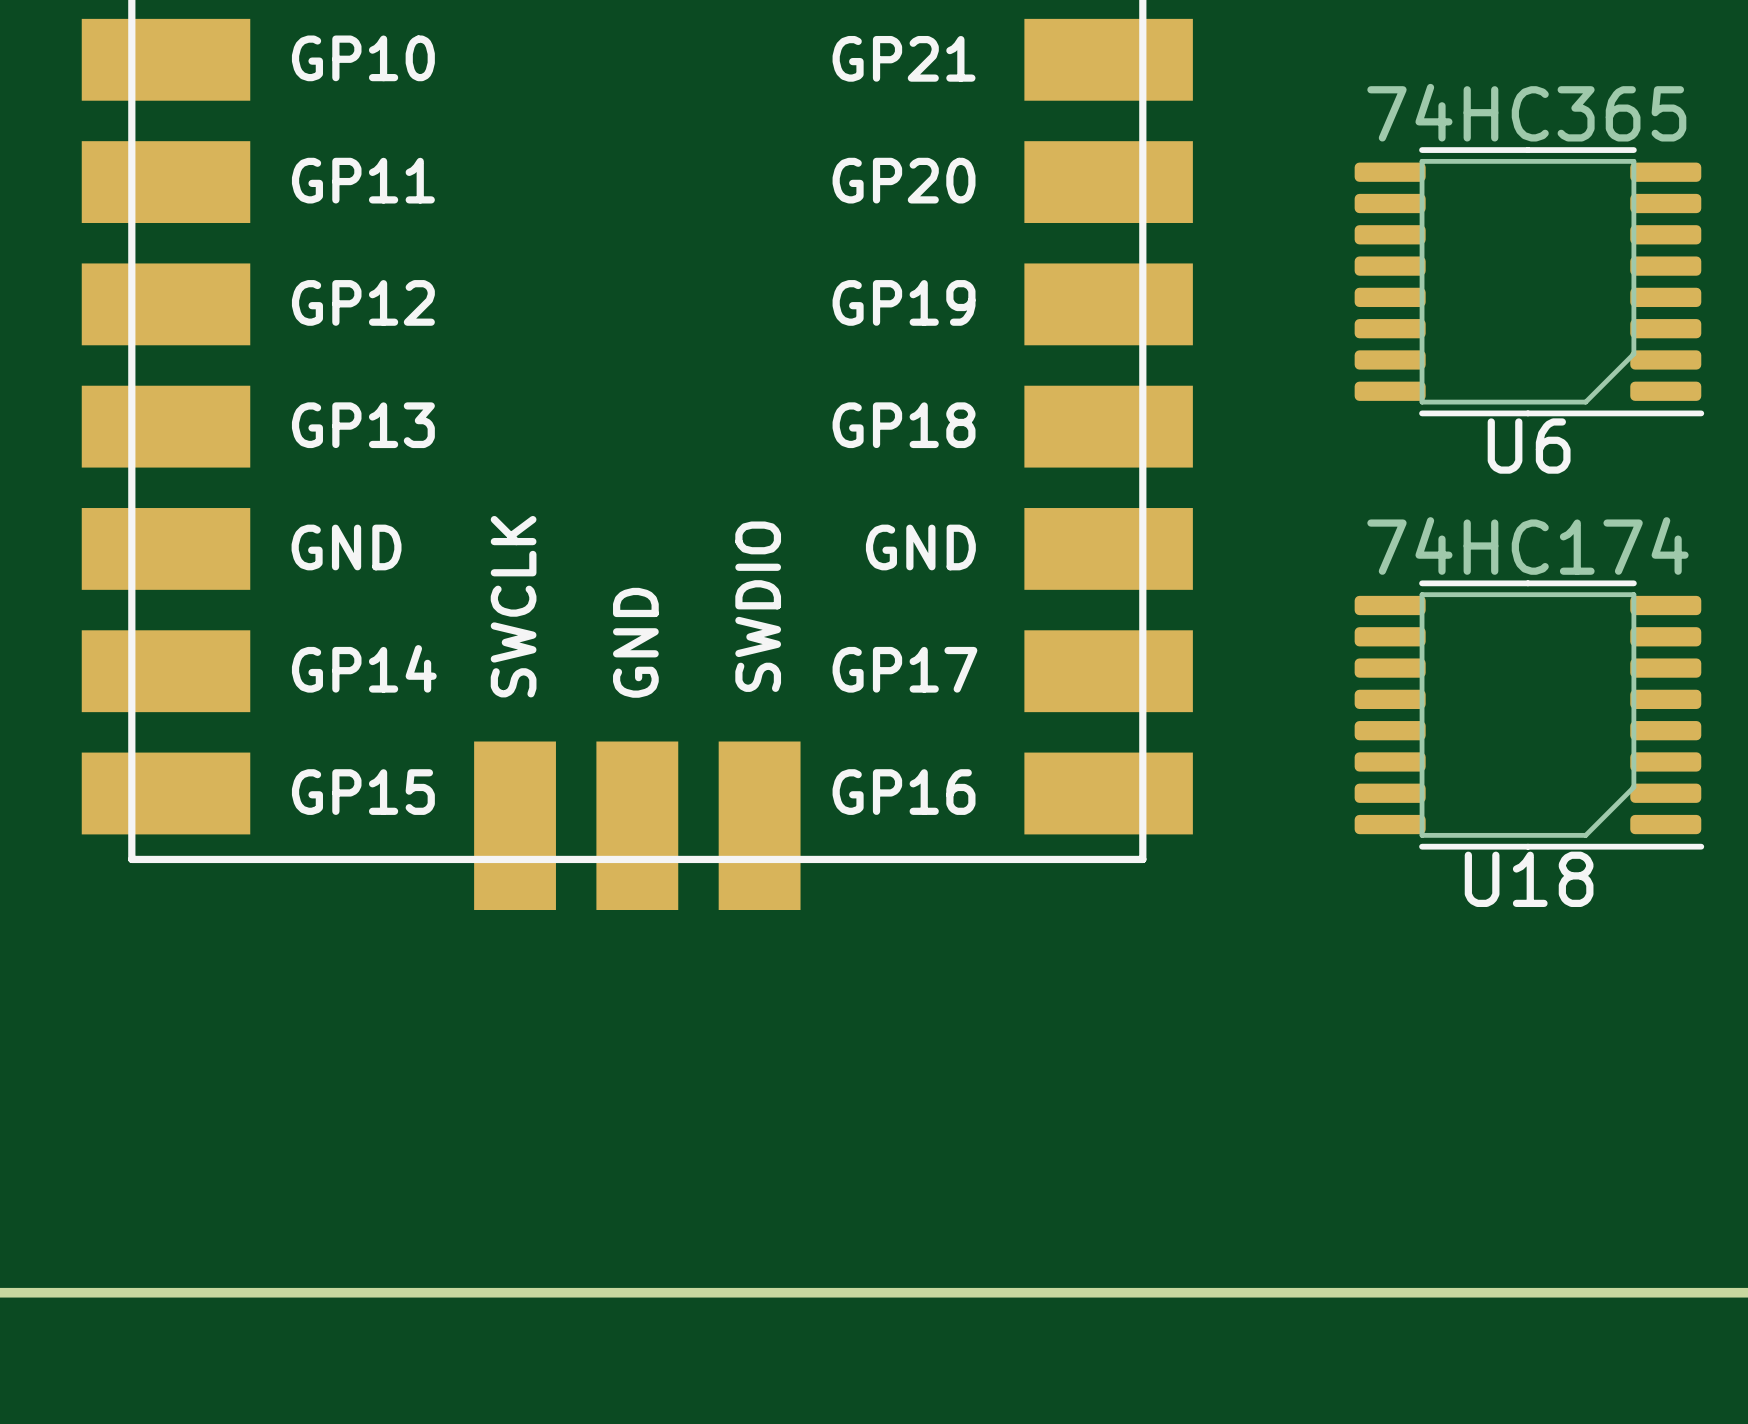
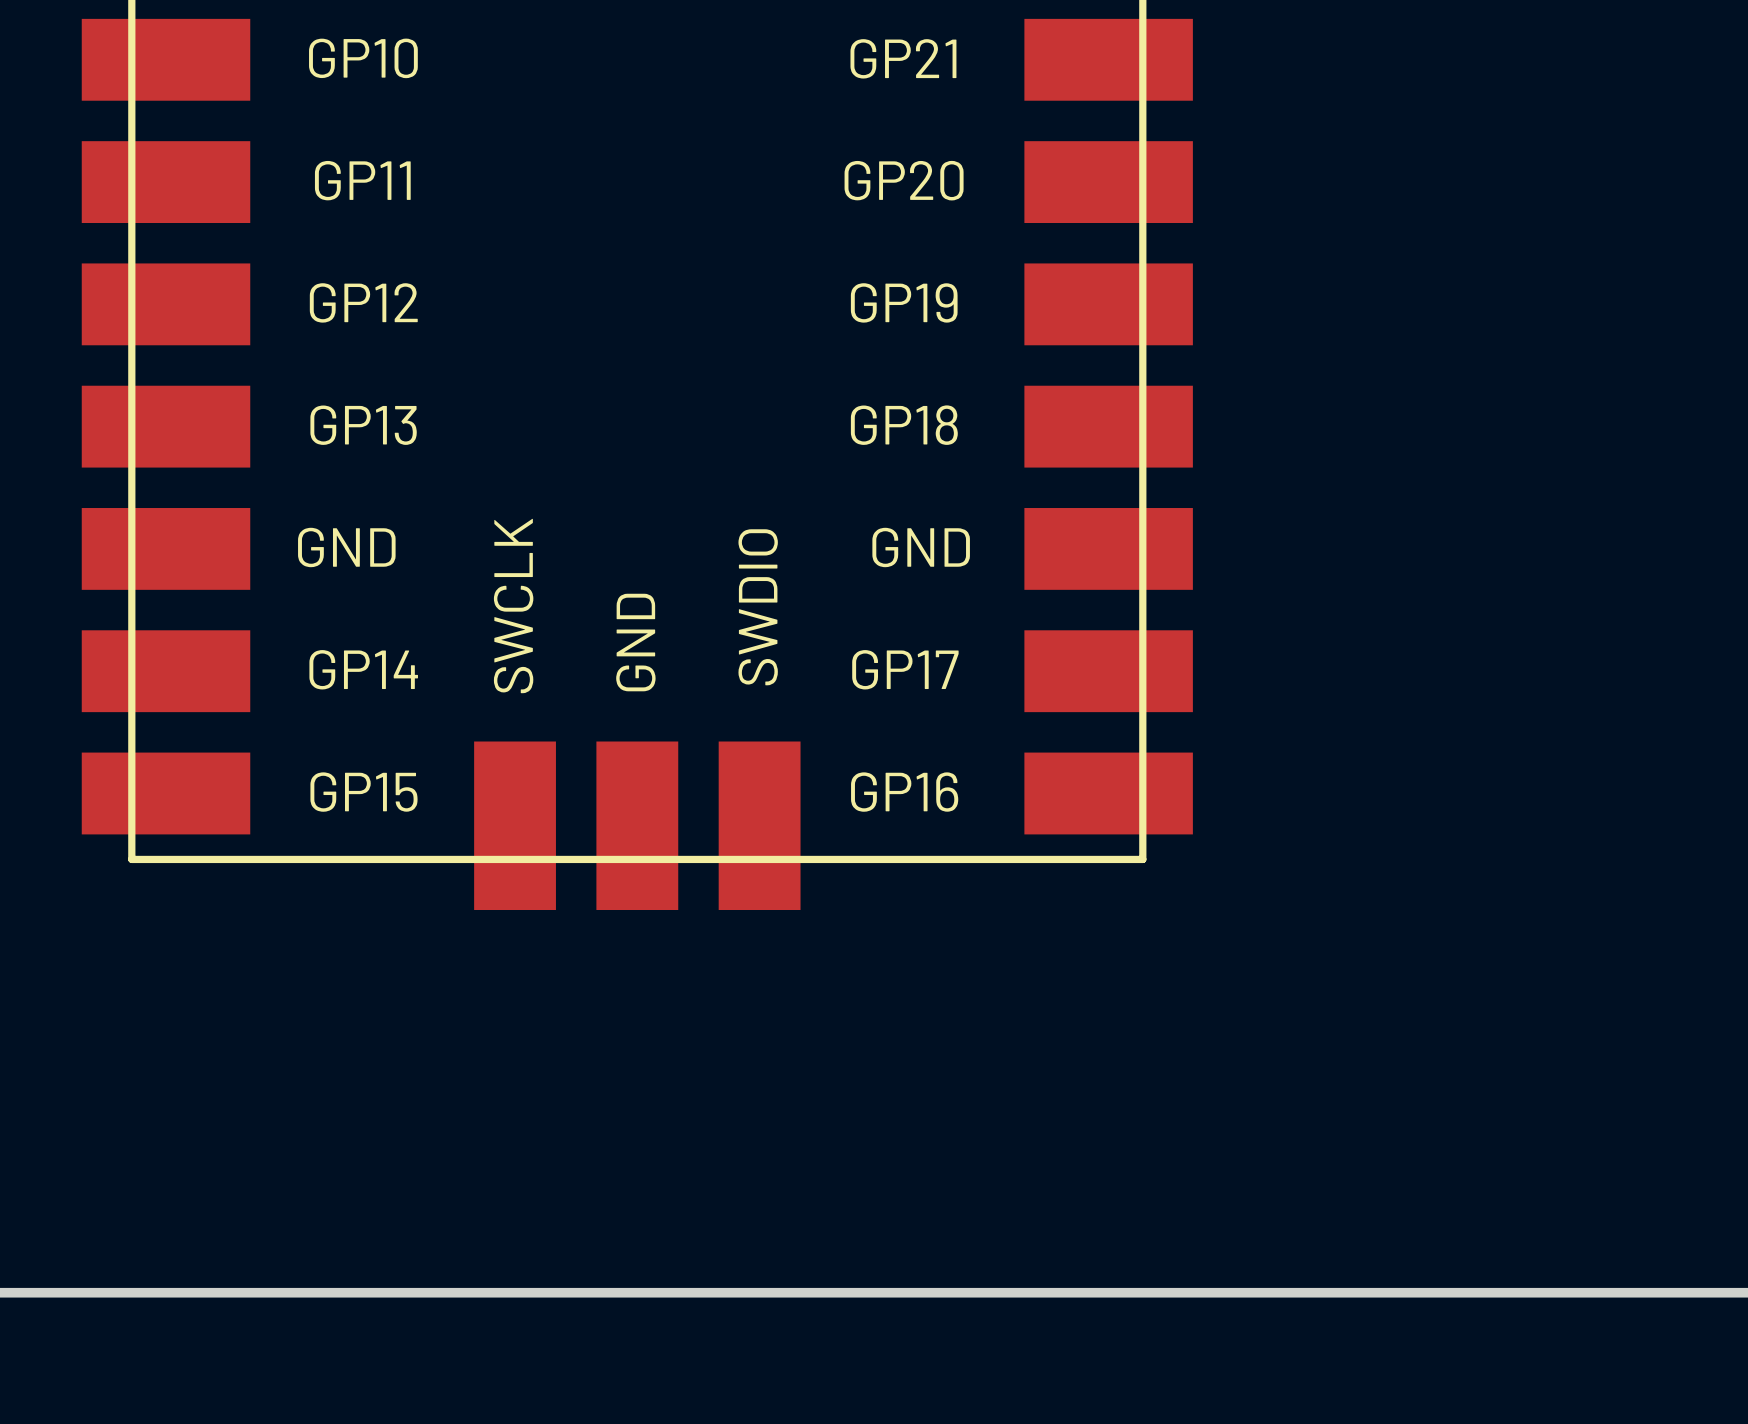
U6: 74HC365 (1529, 281) -> none
U18: 74HC174 (1529, 715) -> none

